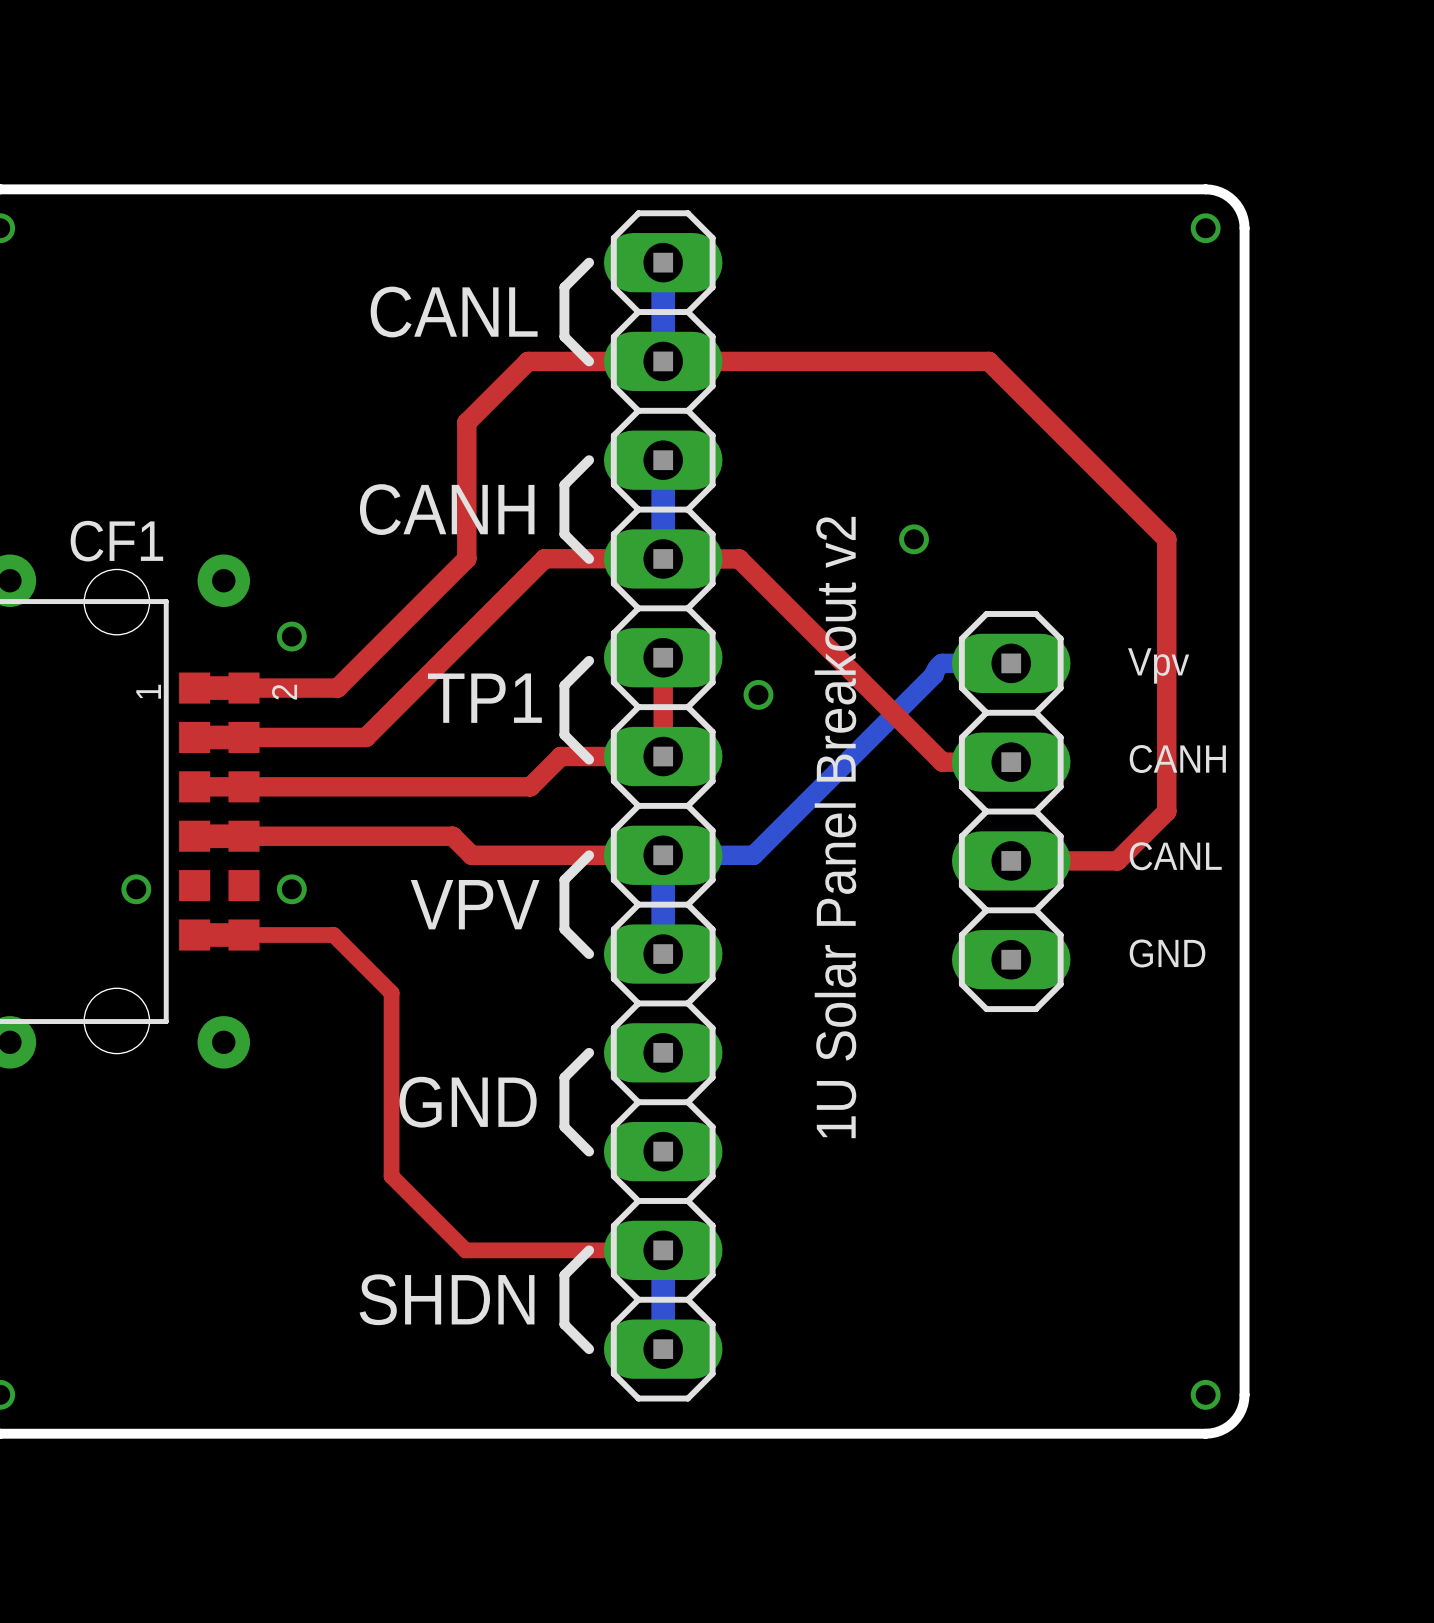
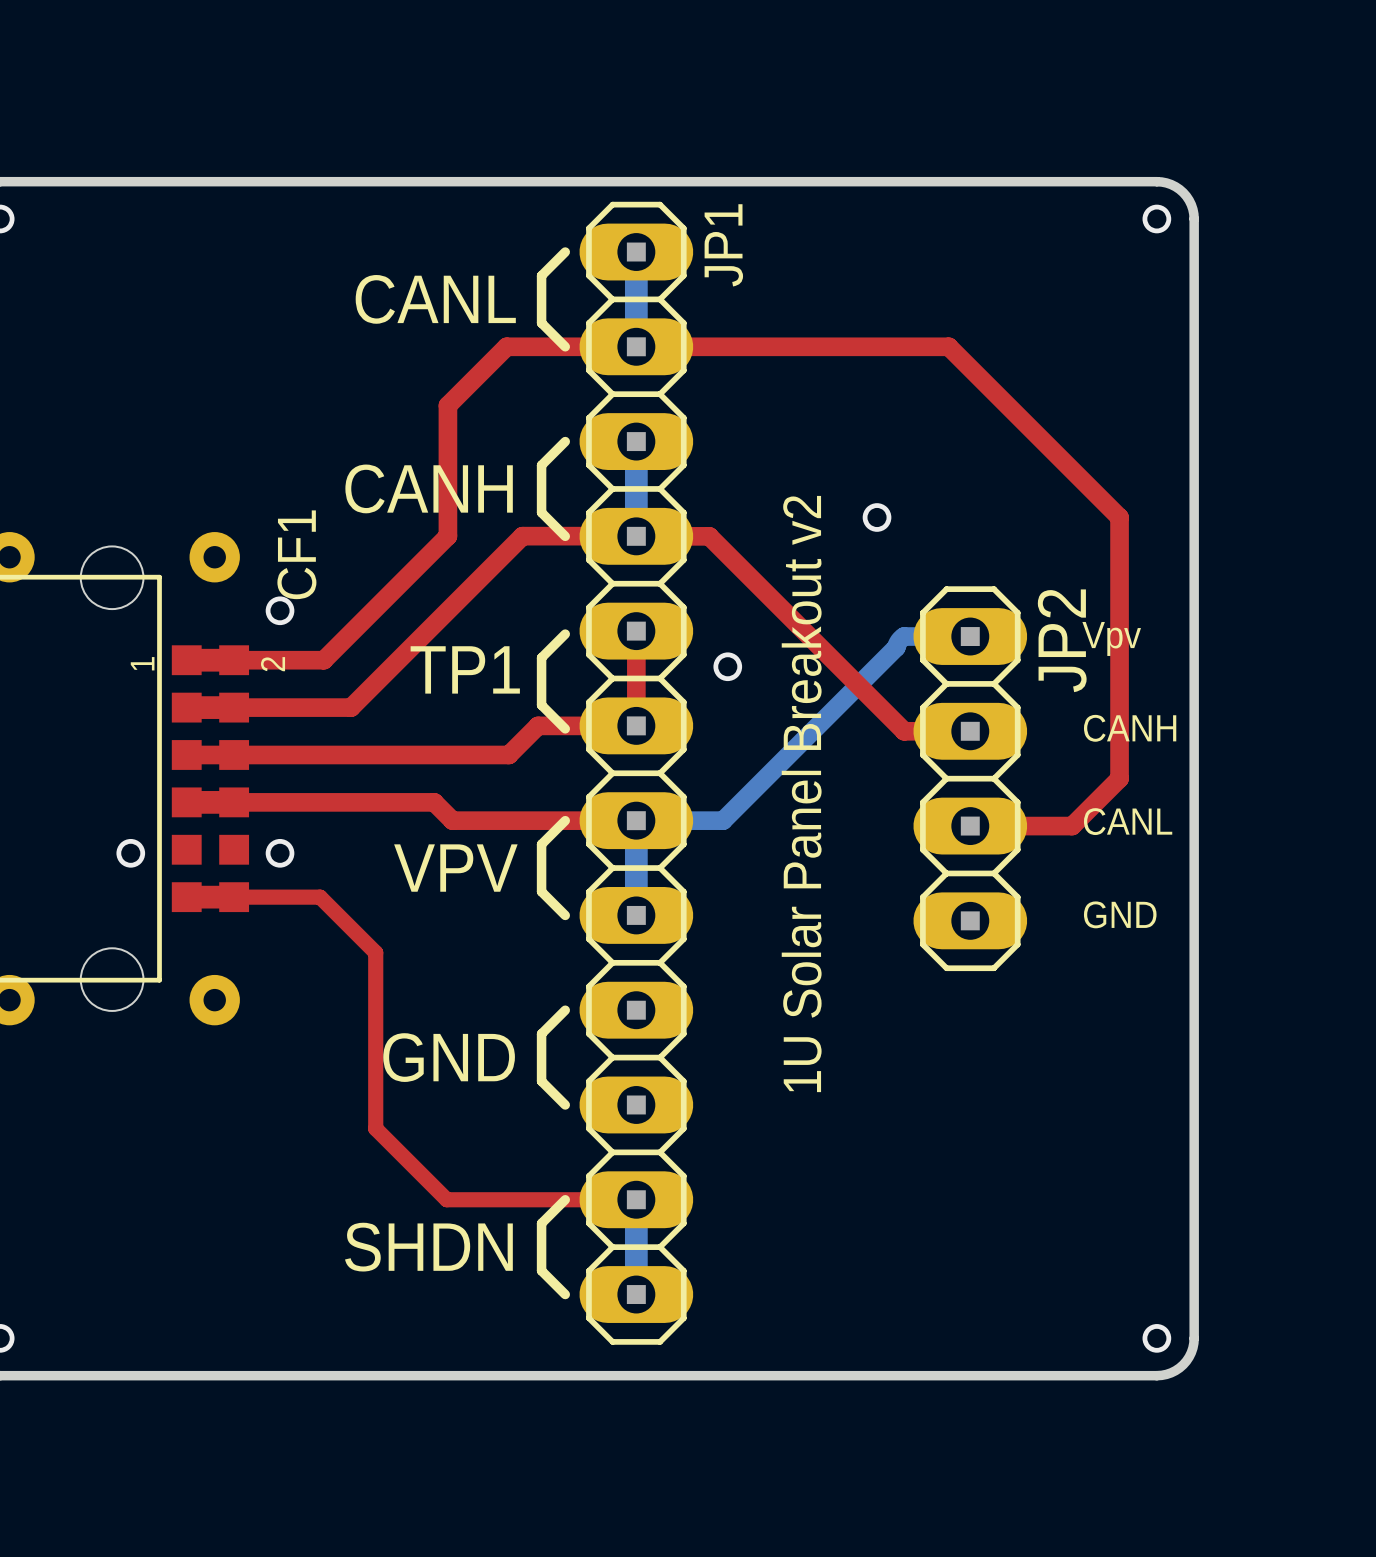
JP1 name: none -> JP1 (723, 245)
CF1 name rotation: 0° (116, 541) -> 90° counterclockwise (296, 554)
CF1 name position: CF1 (116, 541) -> CF1 (296, 554)
JP2 name: none -> JP2 (1062, 640)

